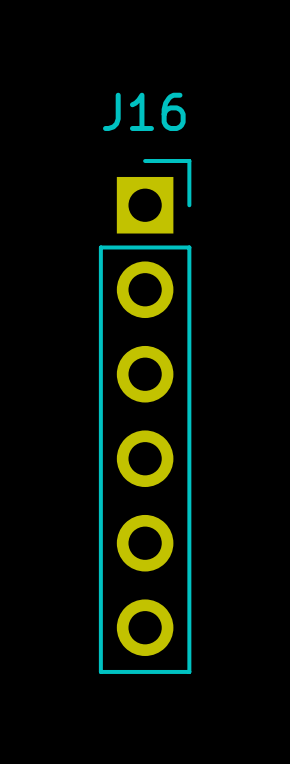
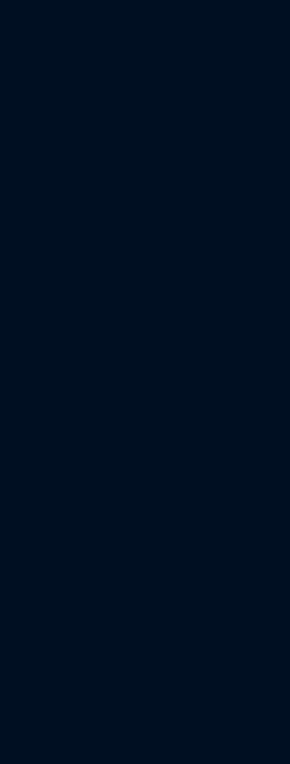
J16: (145, 416) -> none

